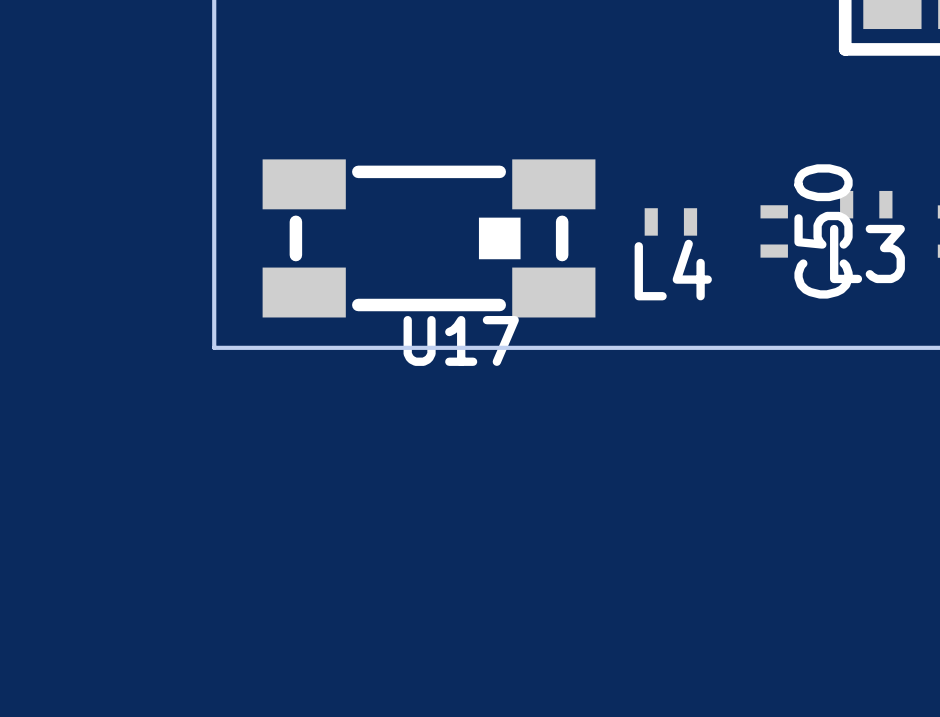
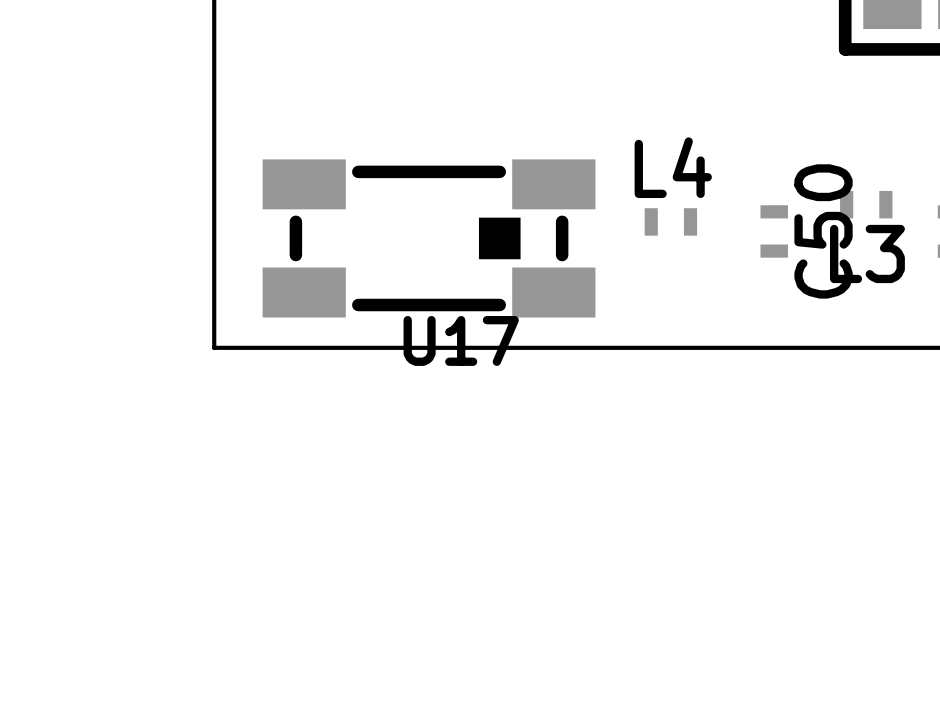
L4 name position: L4 (673, 270) -> L4 (673, 167)

